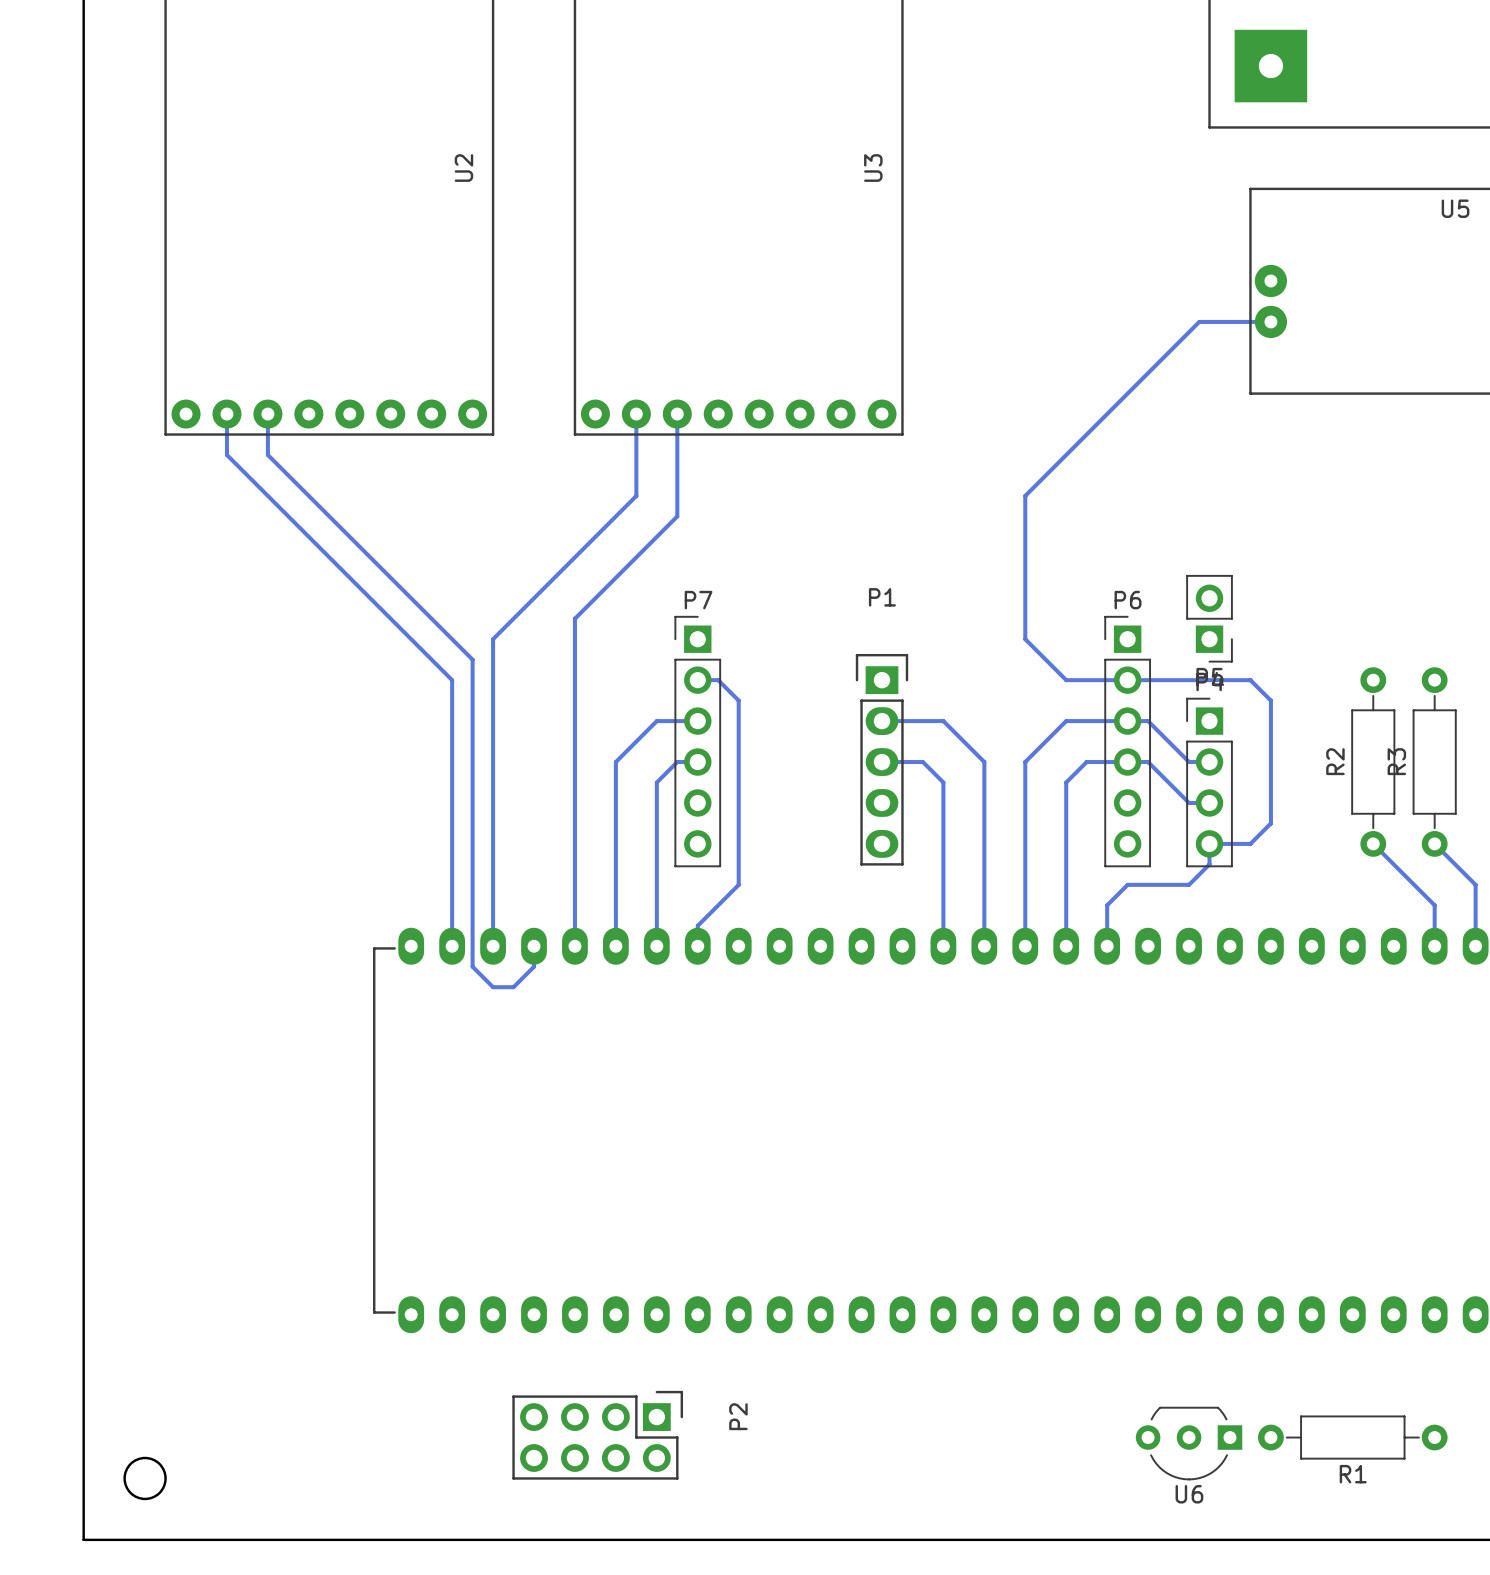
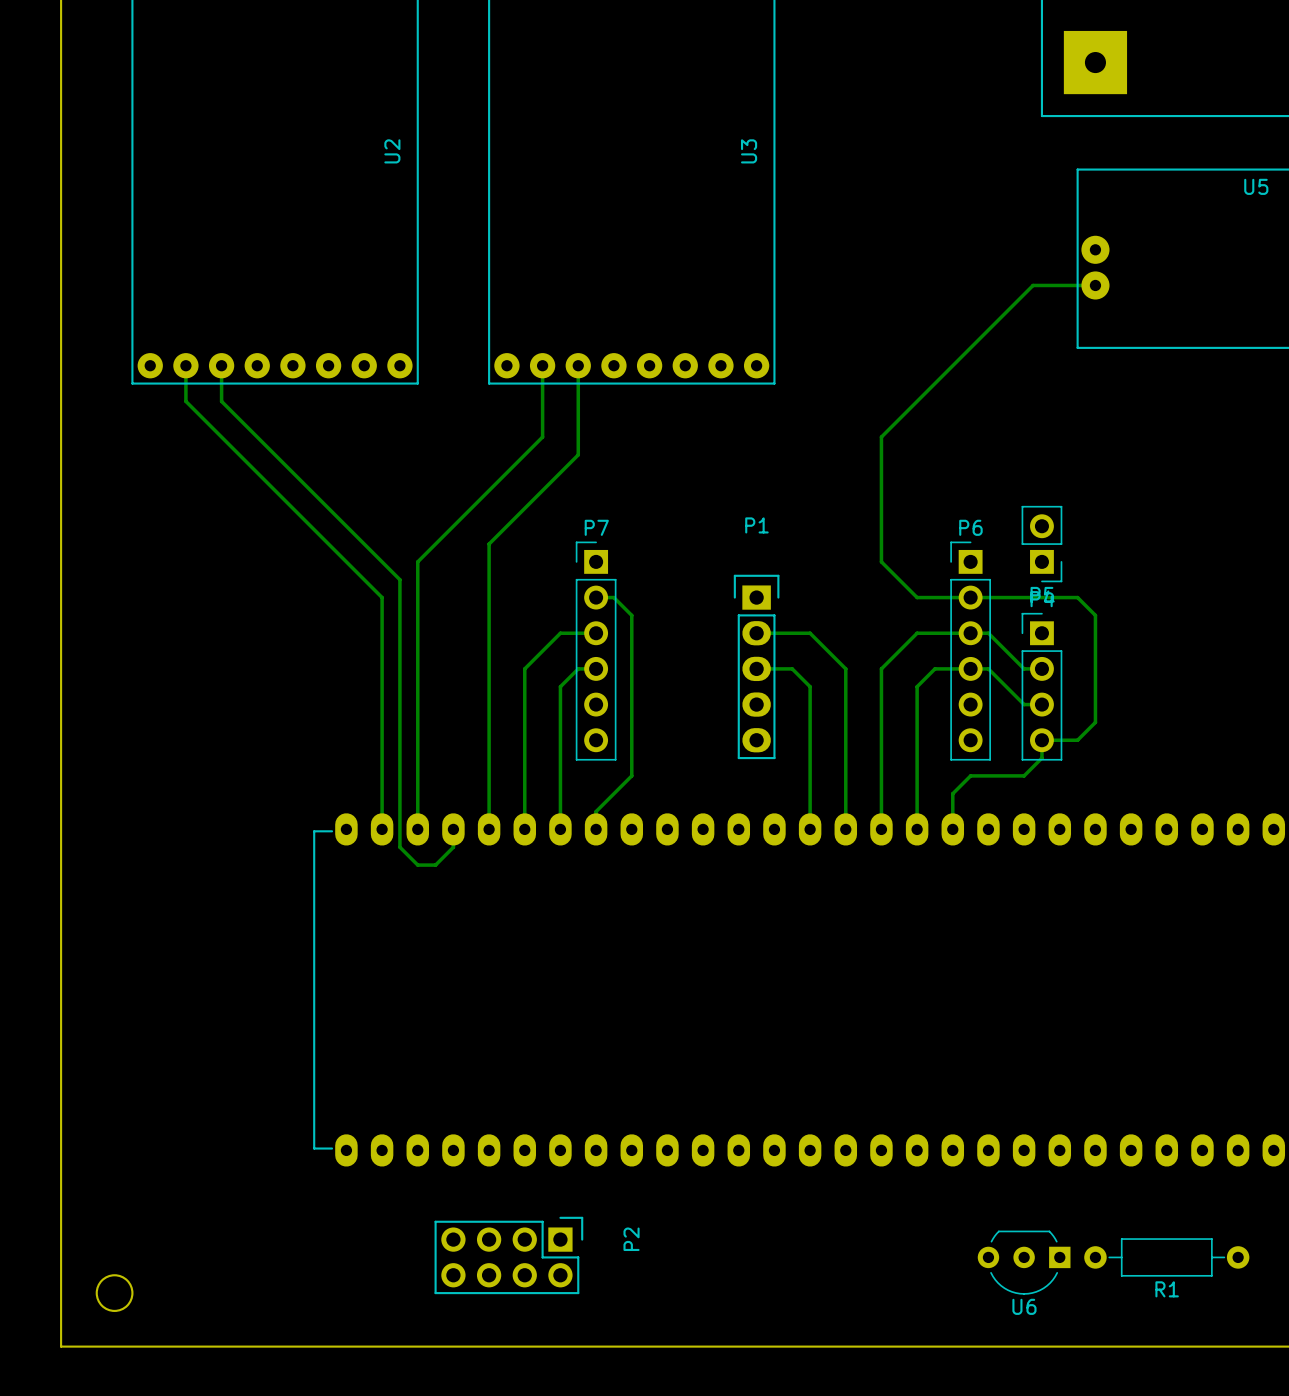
R2: (1373, 762) -> none
R3: (1434, 762) -> none
bottom track: (1373, 843) (1434, 905) (1434, 946) -> none
bottom track: (1434, 843) (1475, 884) (1475, 946) -> none

